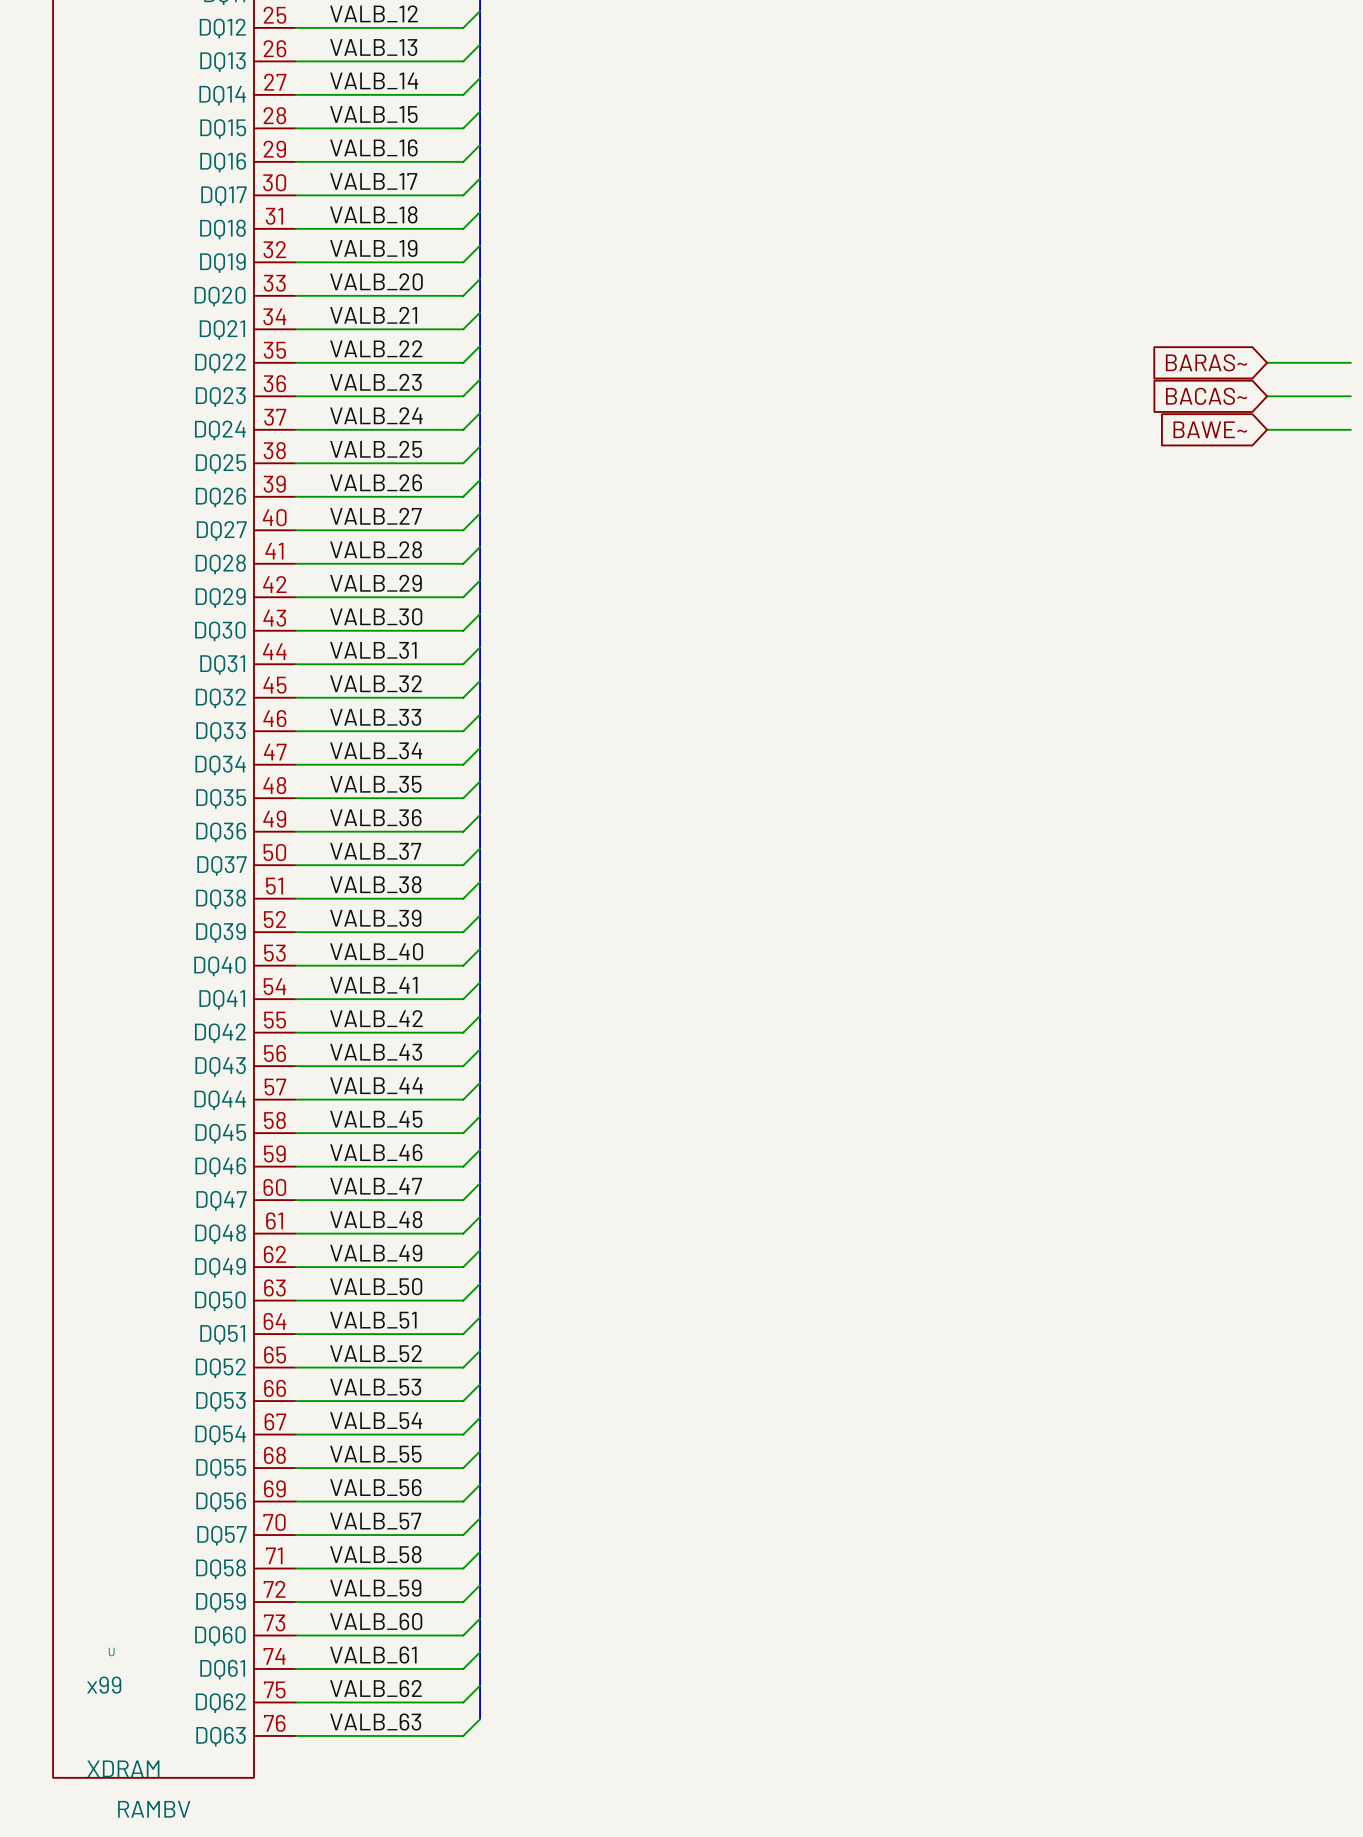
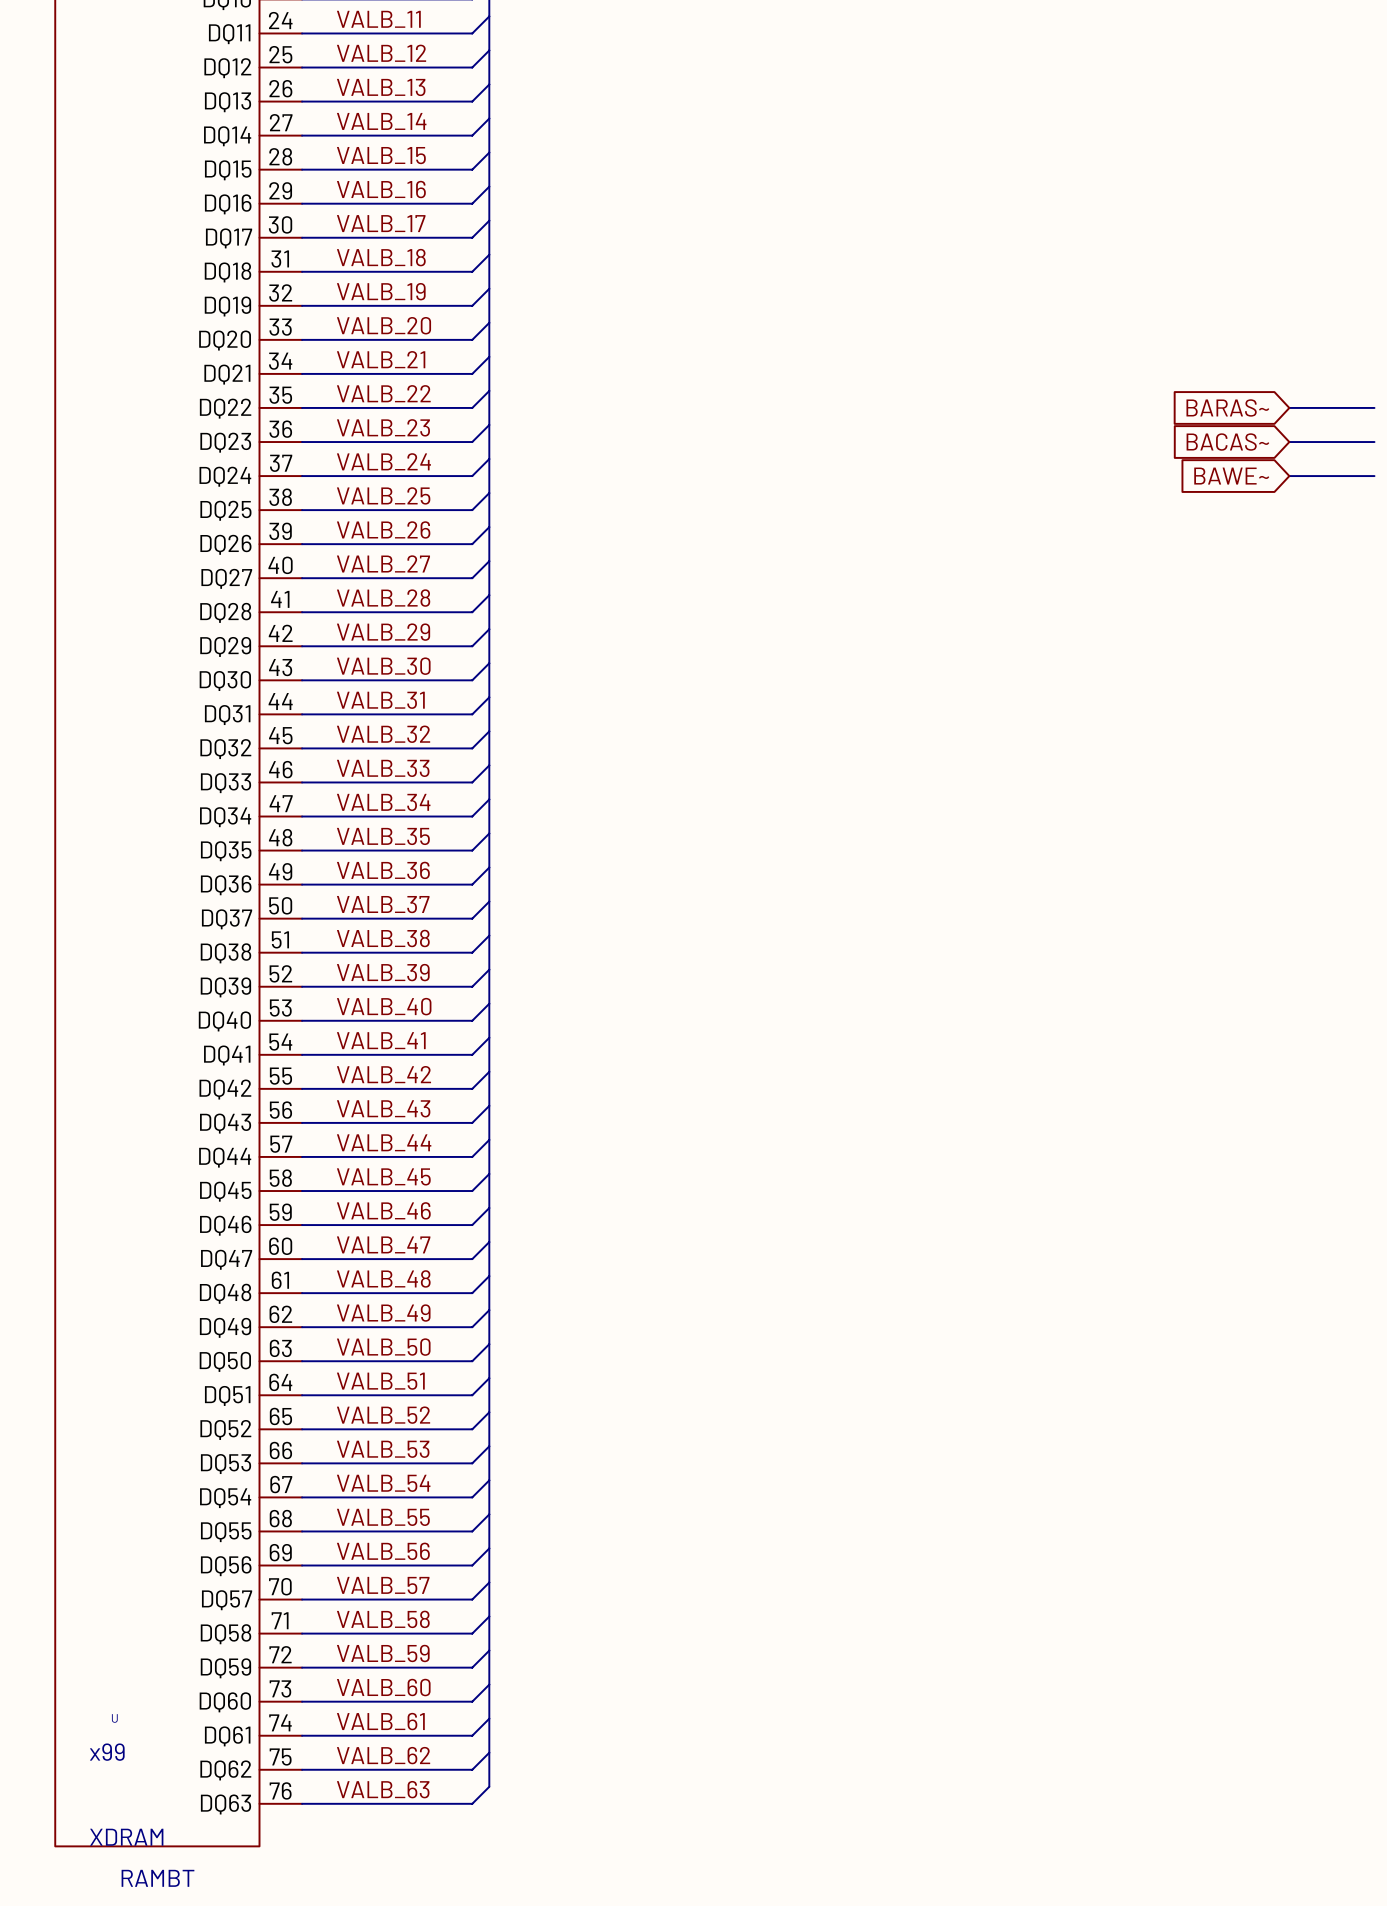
U text: RAMBV (154, 1809) -> RAMBT (157, 1878)

